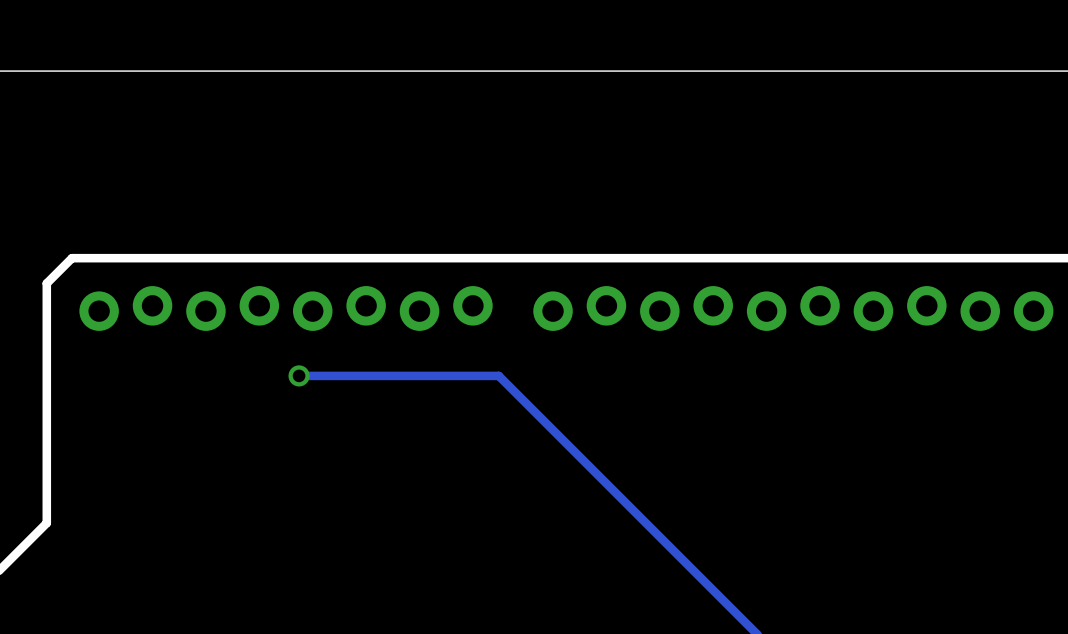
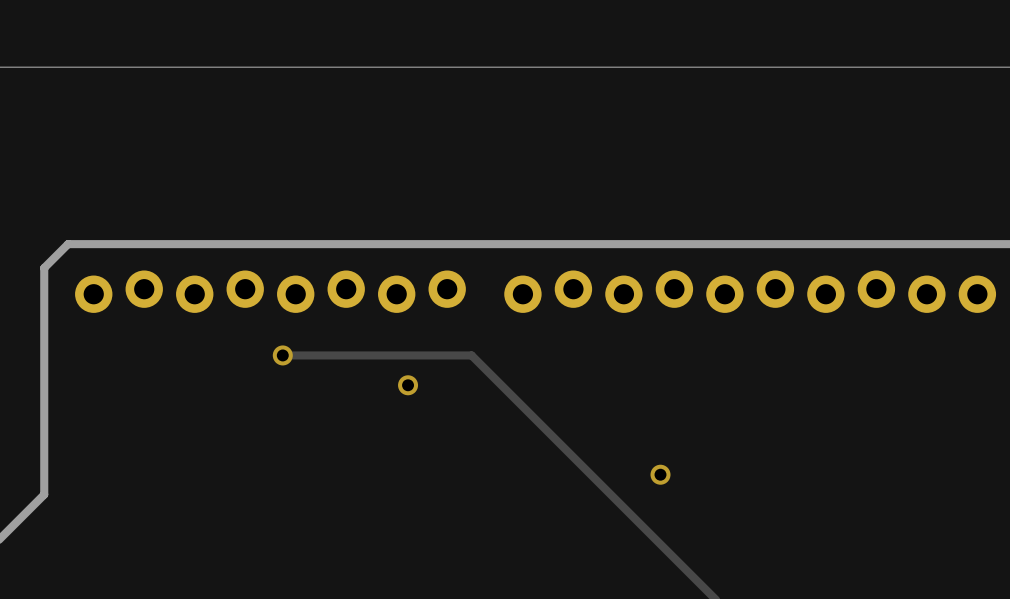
via: none -> (408, 385)
via: none -> (660, 474)

